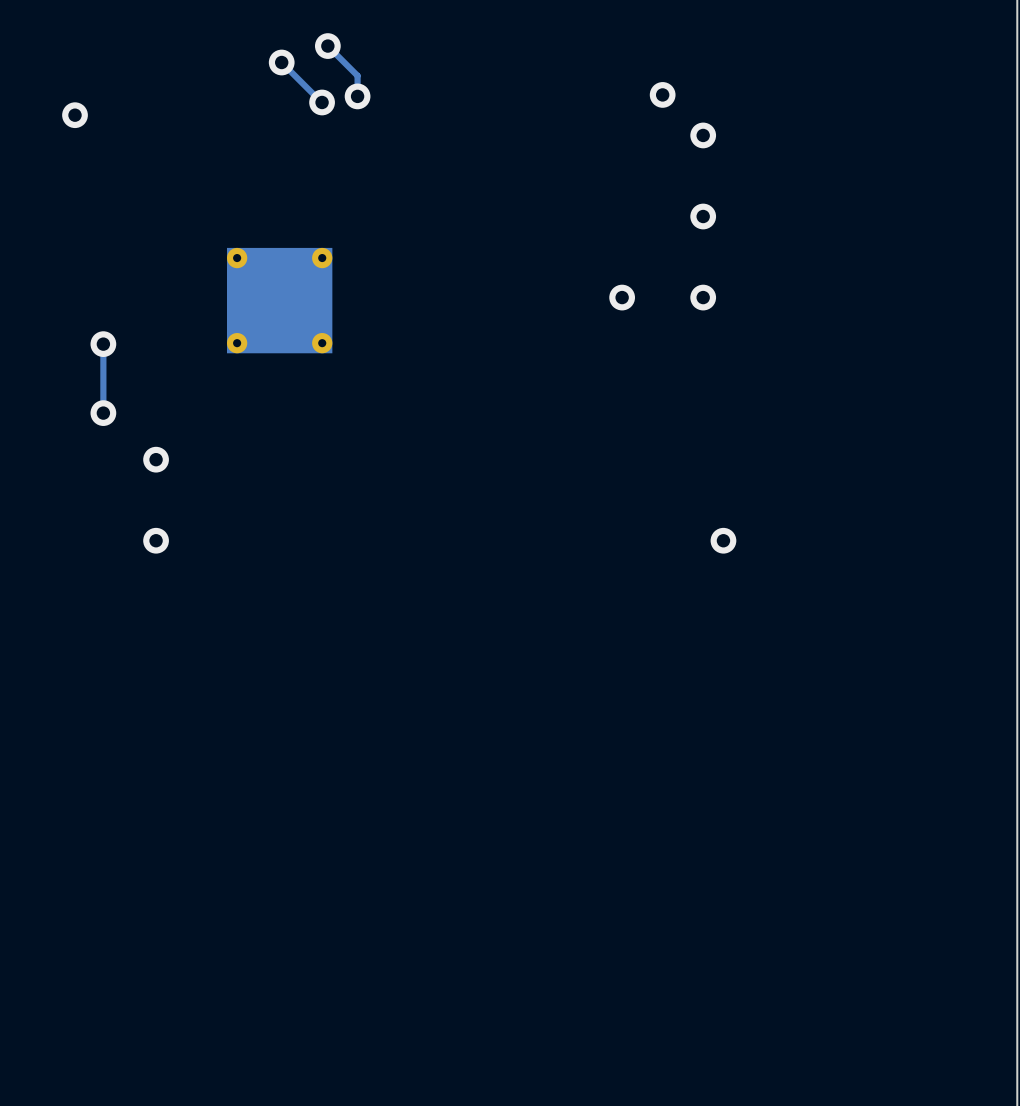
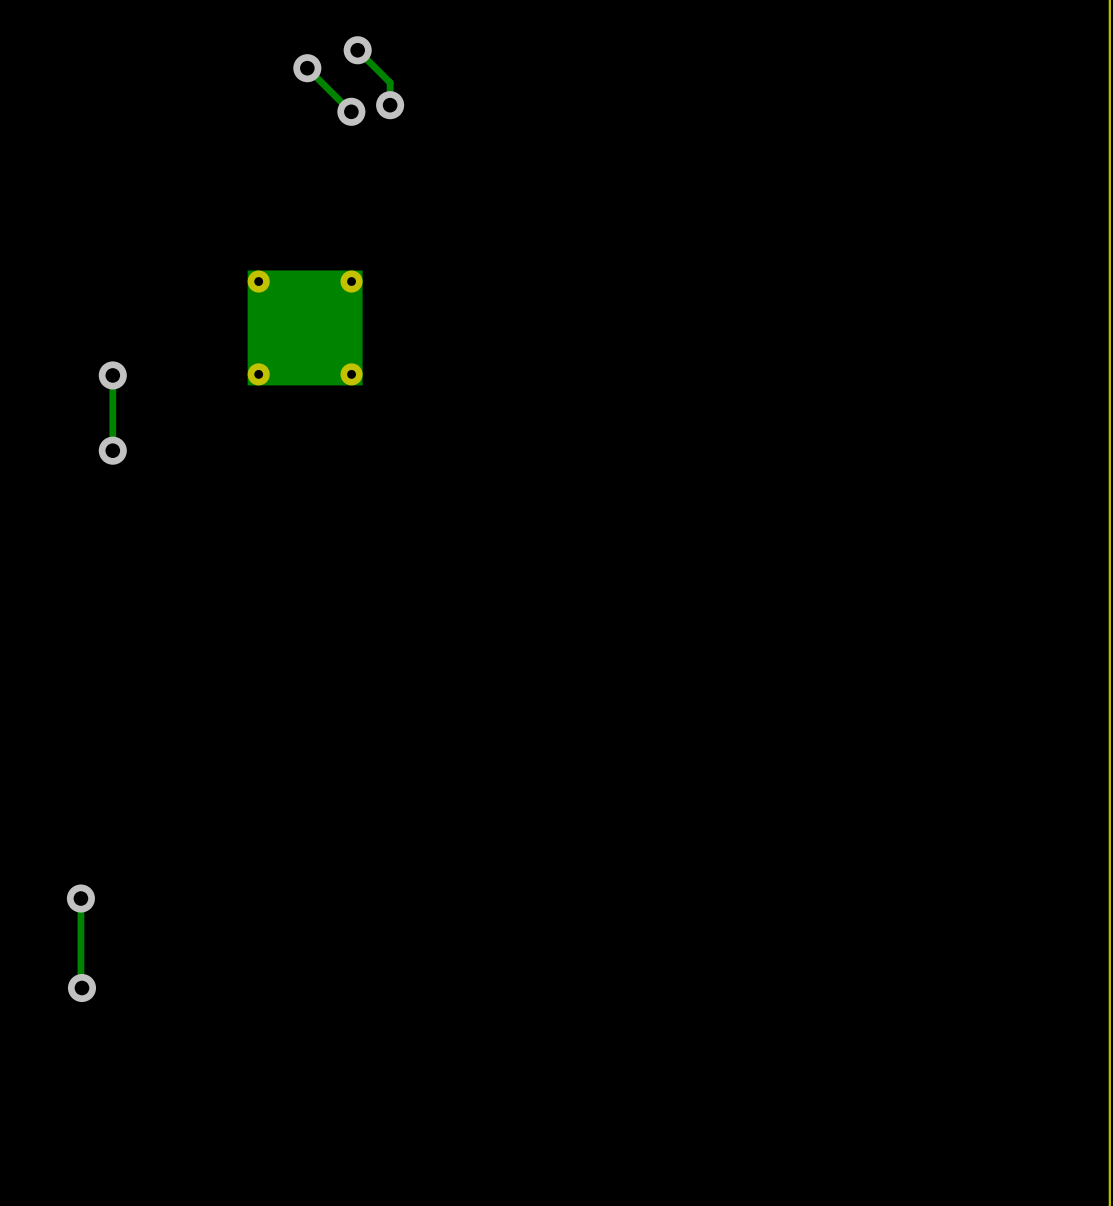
via: (662, 94) -> none
via: (75, 115) -> none
via: (703, 135) -> none
via: (703, 216) -> none
via: (622, 297) -> none
via: (703, 297) -> none
via: (156, 459) -> none
via: (156, 540) -> none
via: (723, 540) -> none
track: none -> (80, 898) (81, 988)
via: none -> (80, 898)
via: none -> (81, 988)

